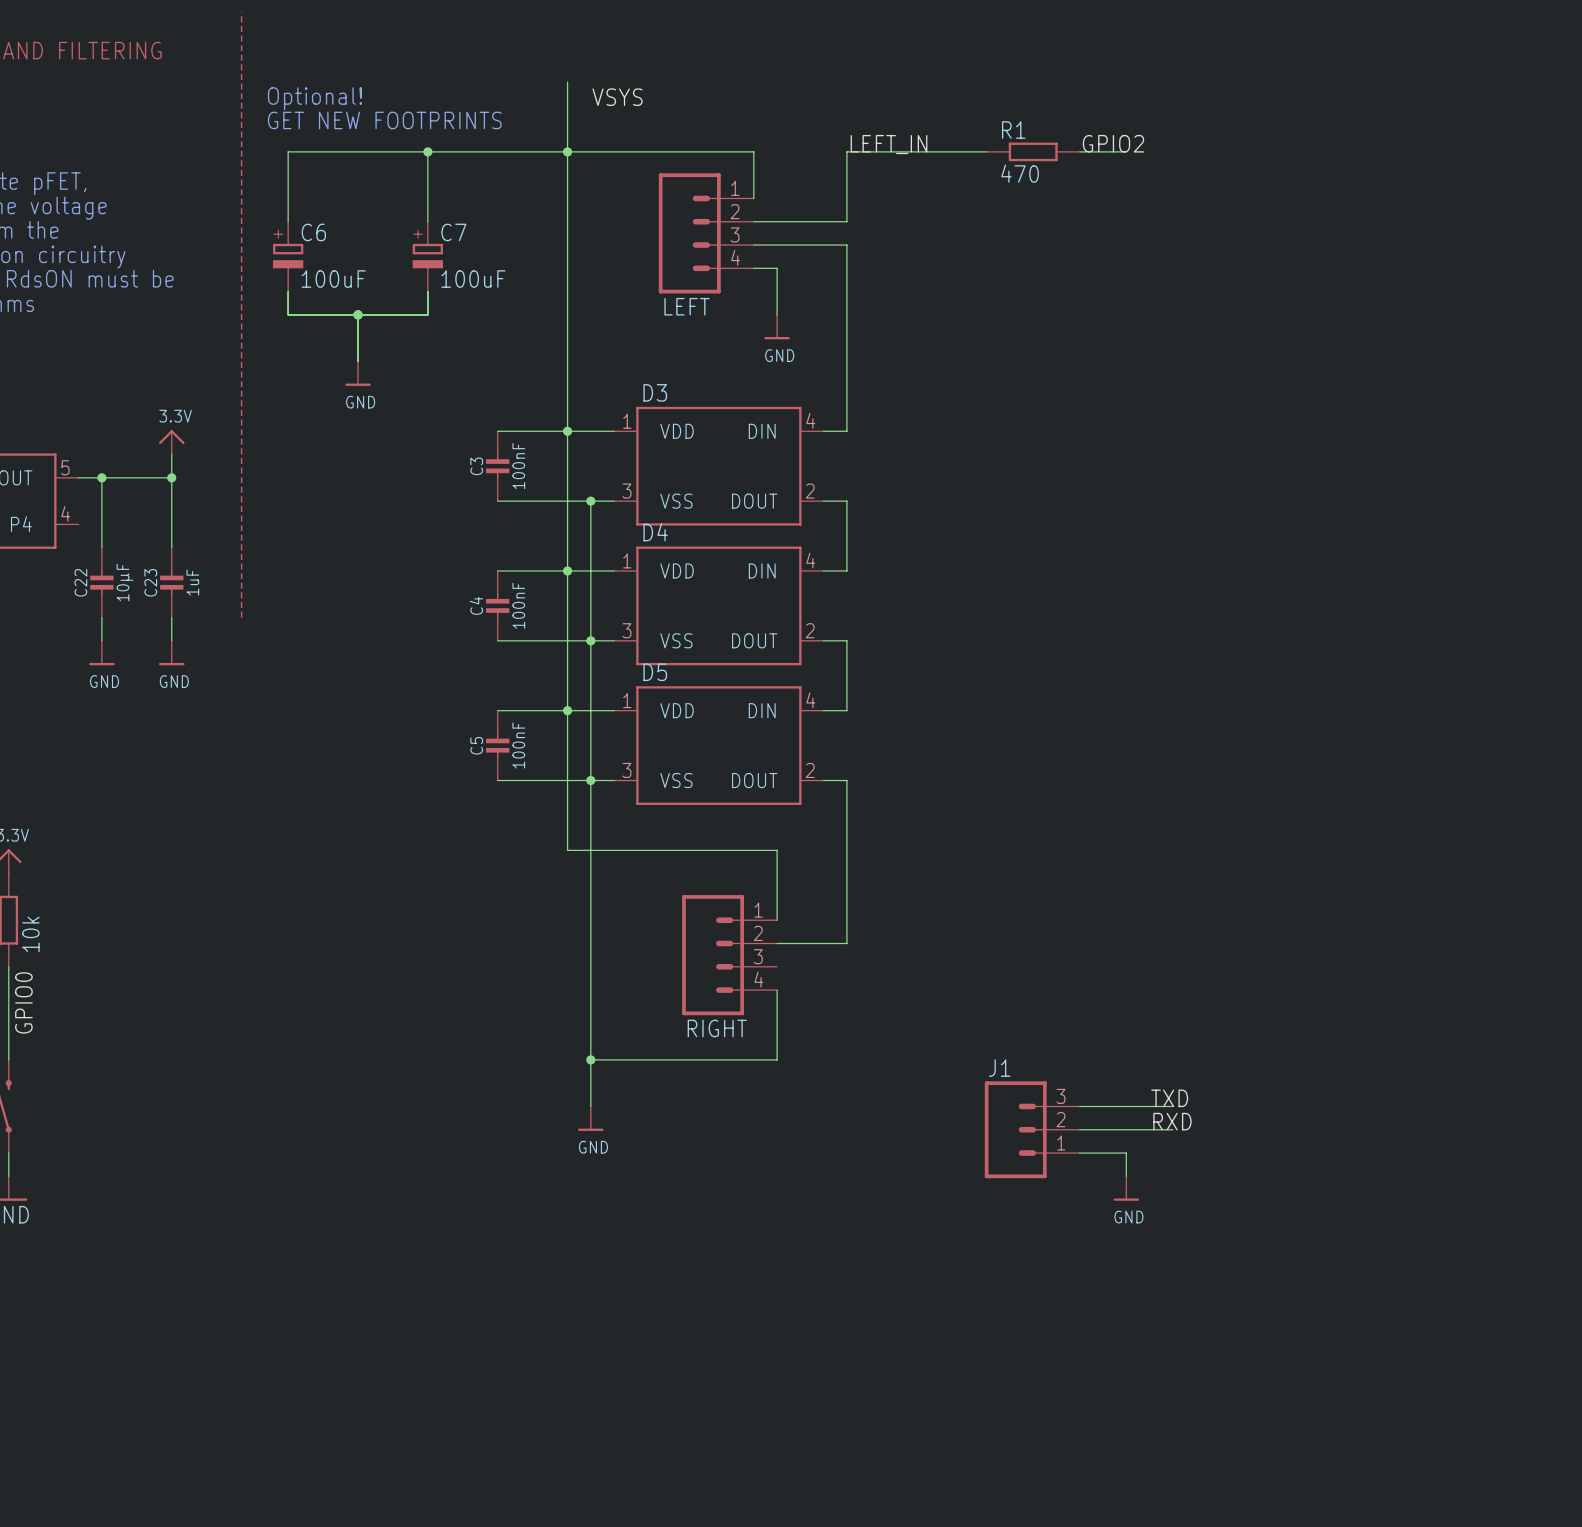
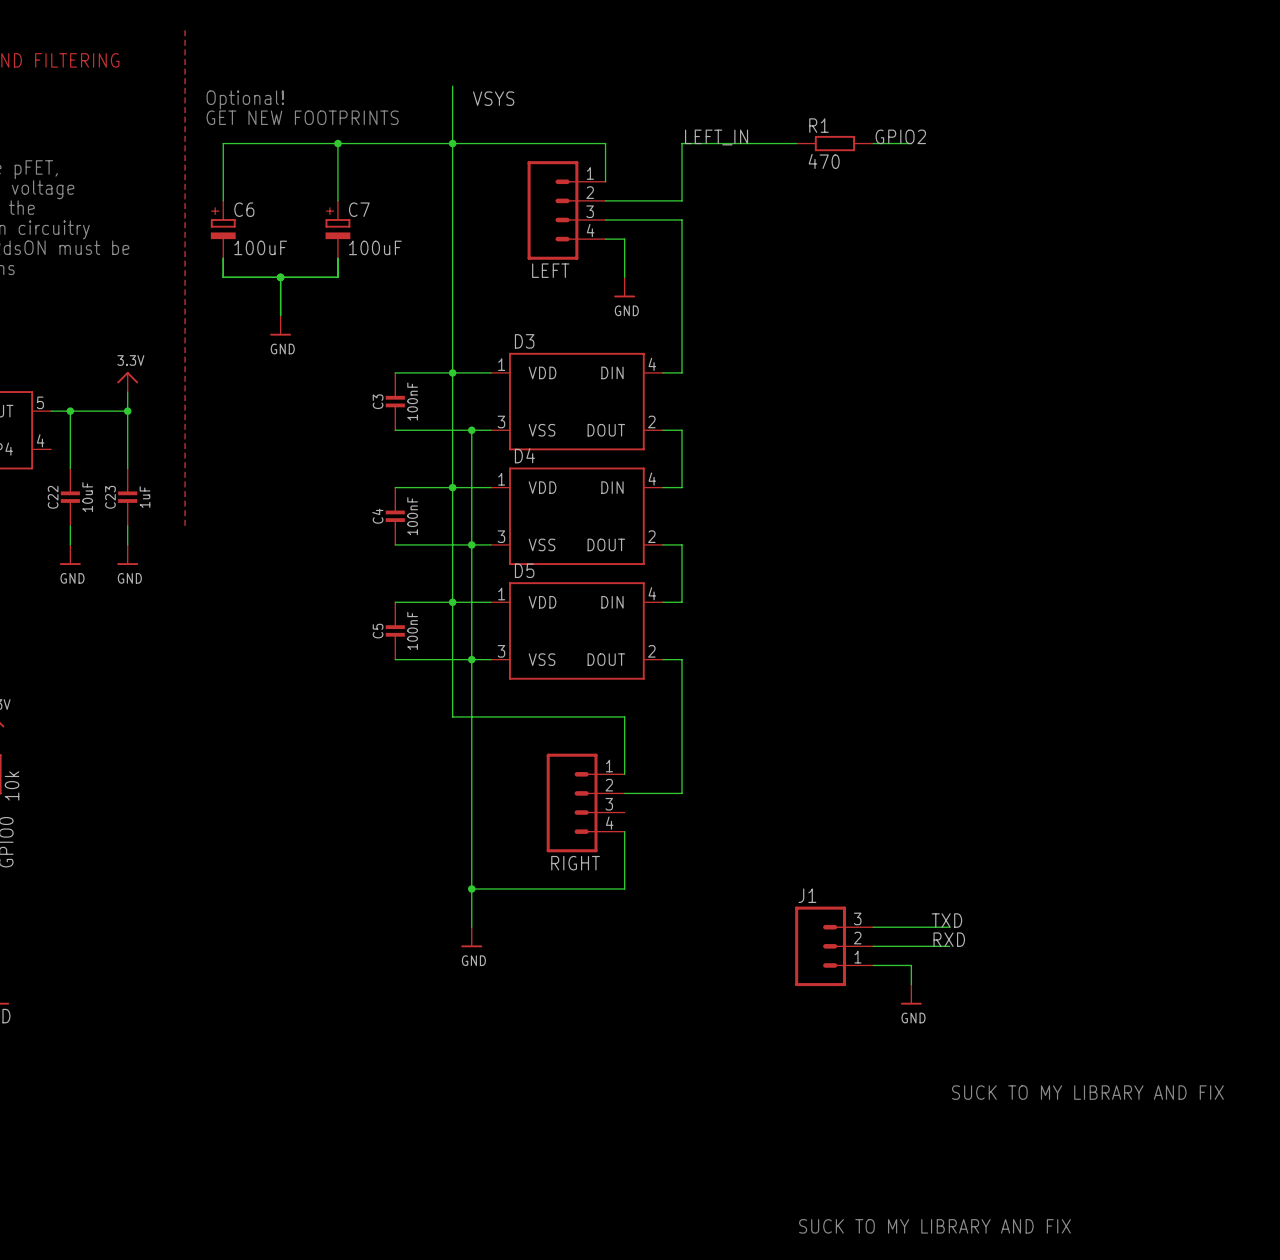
C22 value: 10µF (124, 582) -> 10uF (87, 497)
text: none -> SUCK TO MY LIBRARY AND FIX (1087, 1092)
text: none -> SUCK TO MY LIBRARY AND FIX (935, 1226)

